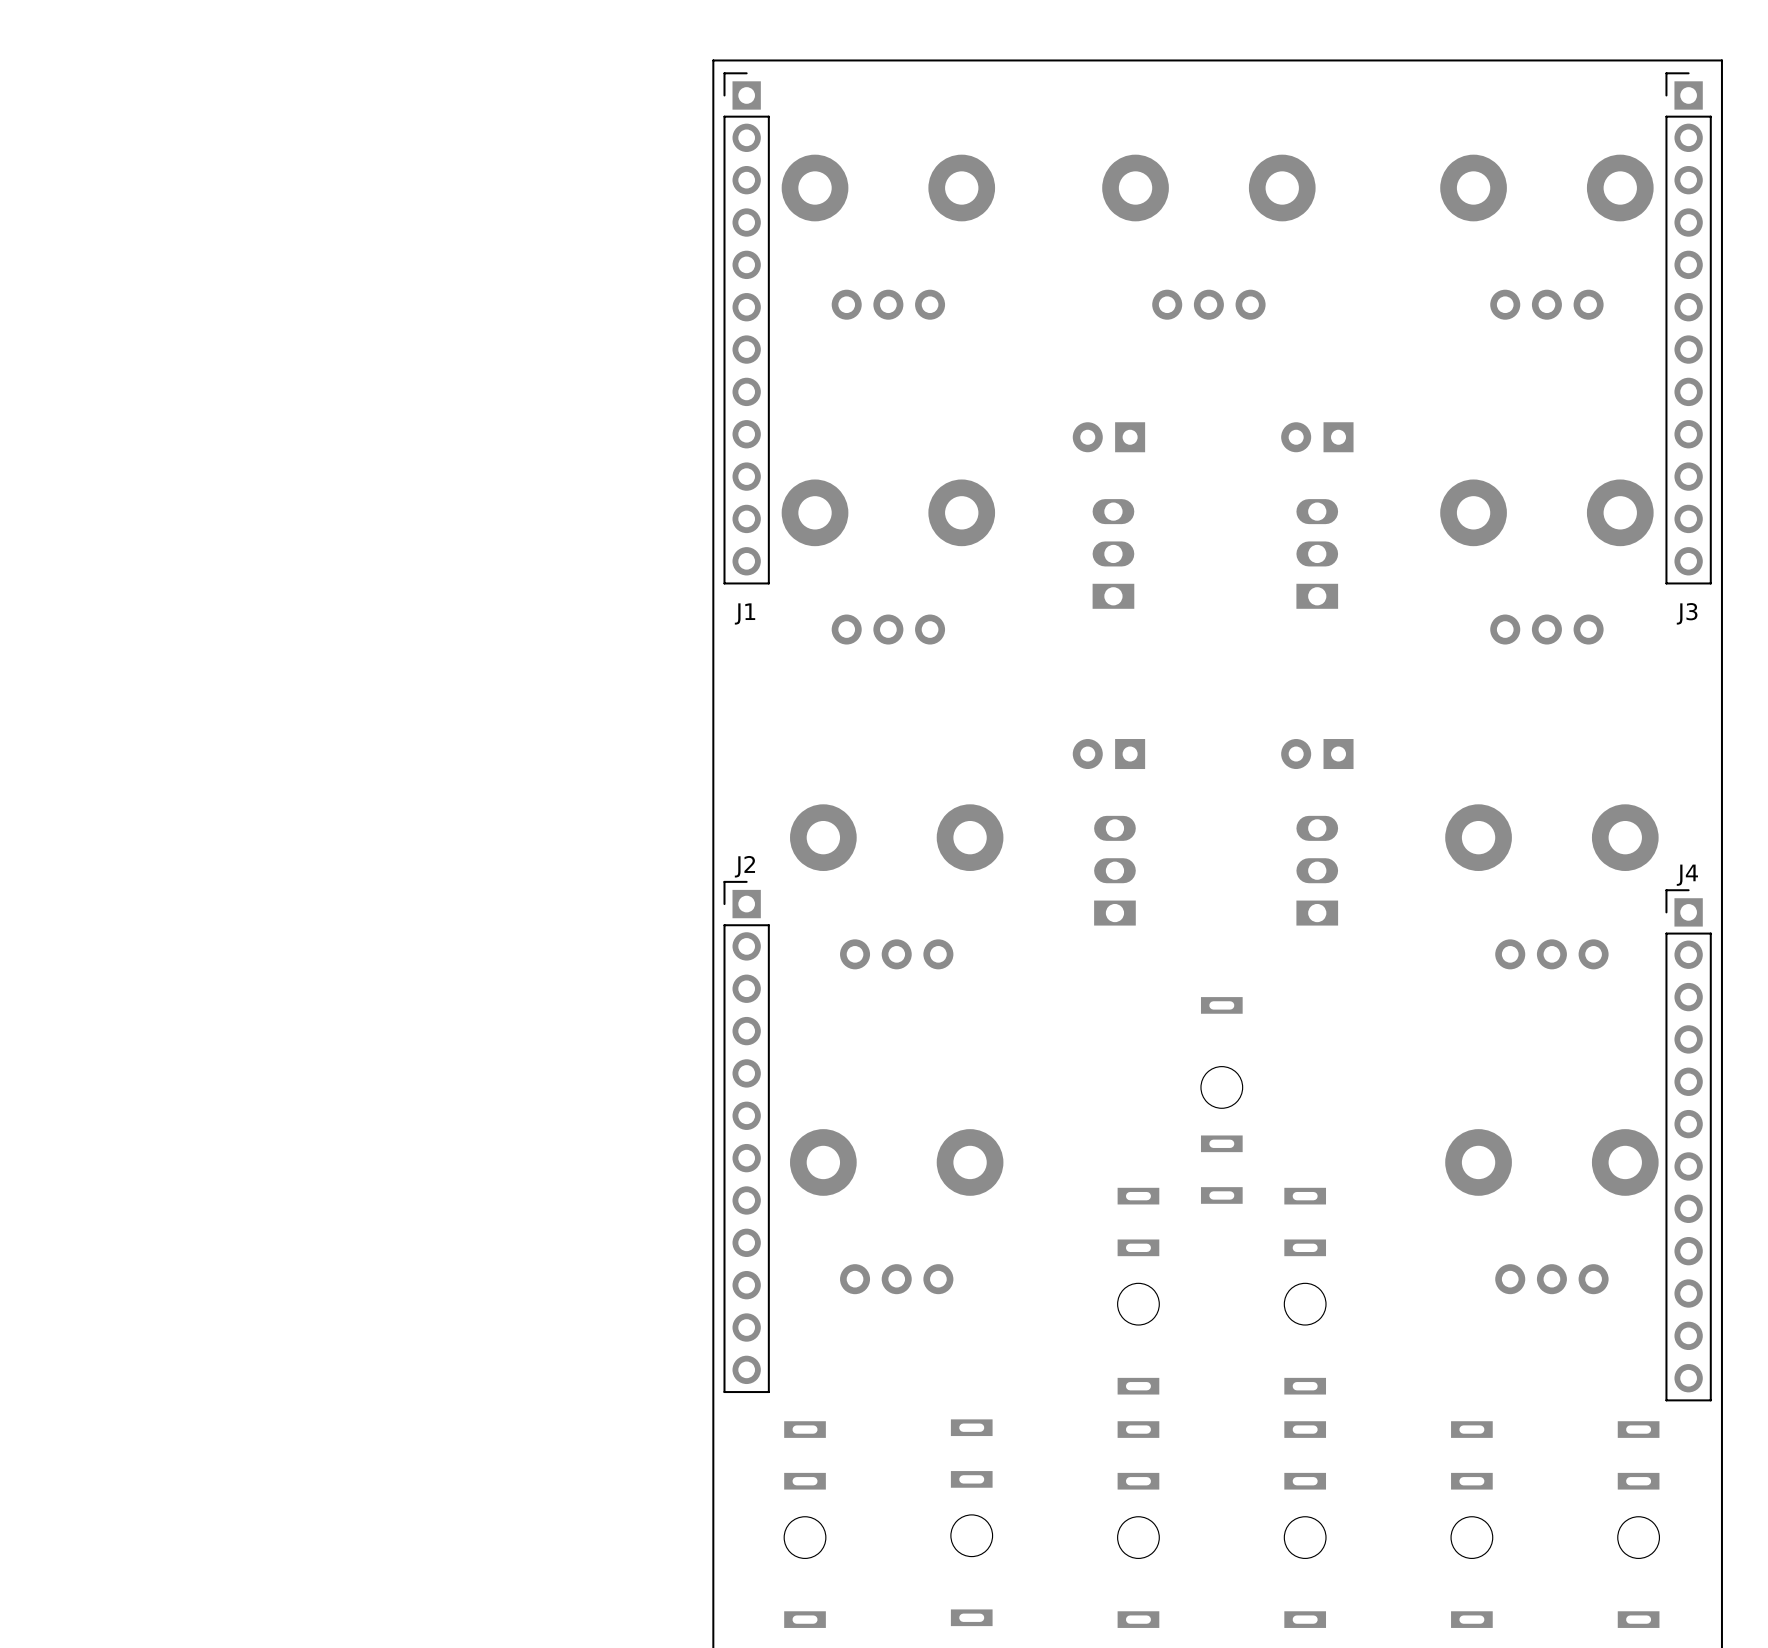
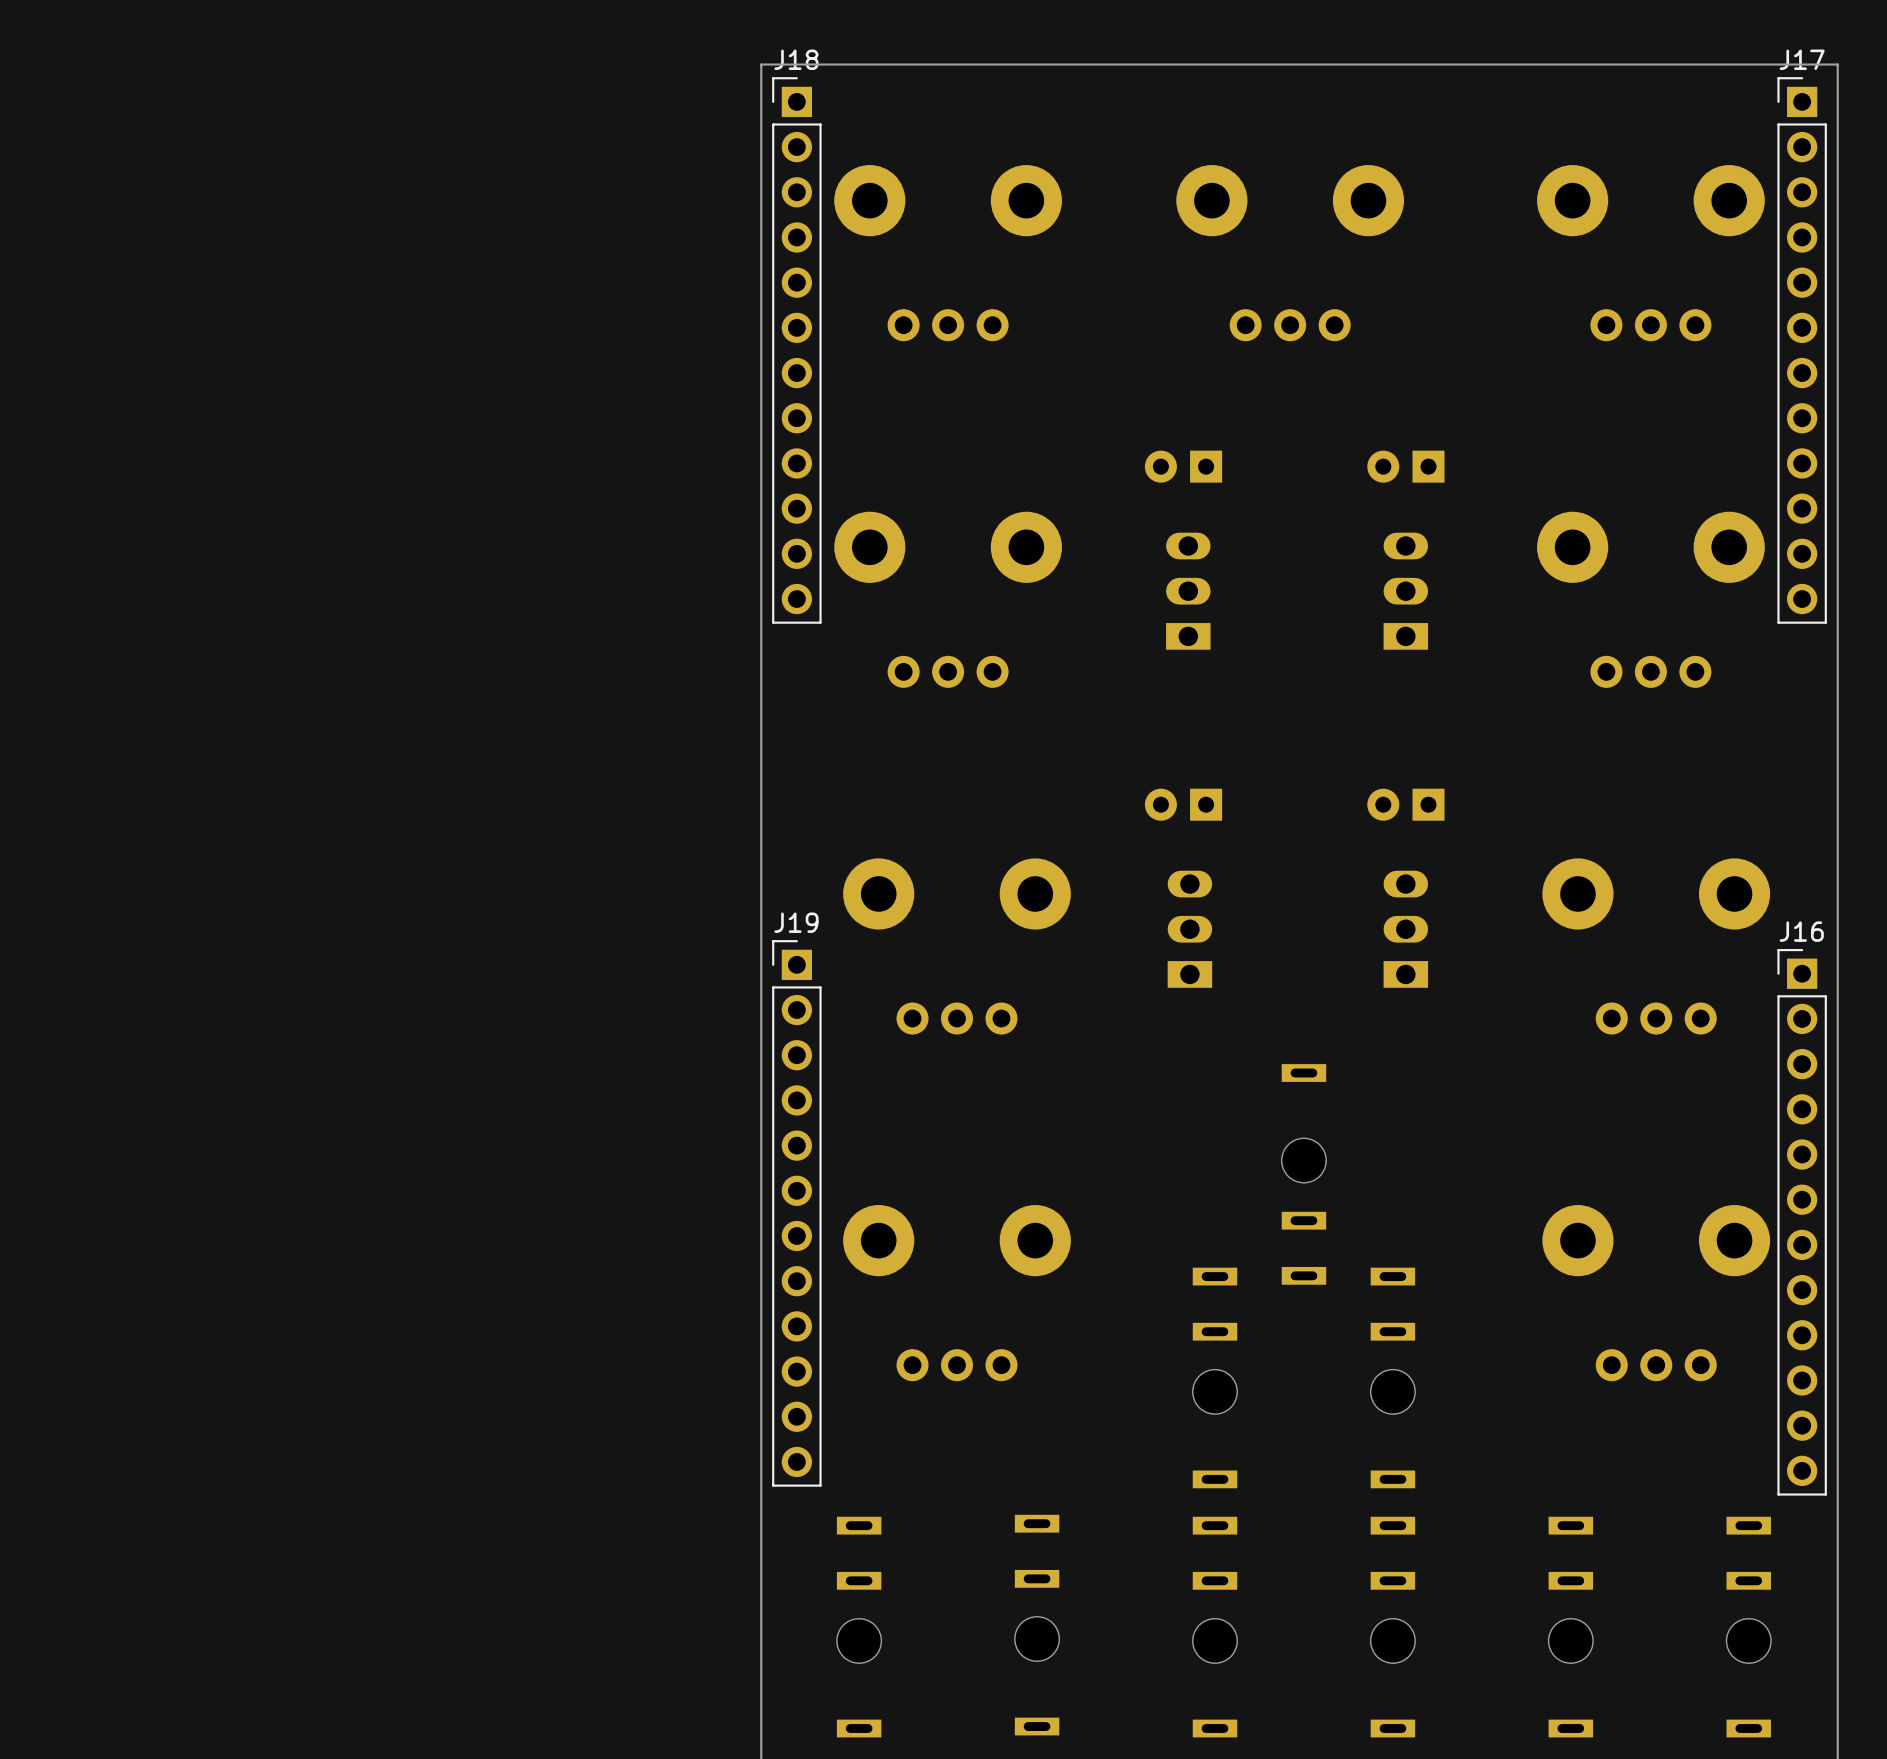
J1 name: J1 (745, 613) -> J18 (796, 59)
J3 name: J3 (1687, 613) -> J17 (1802, 59)
J2 name: J2 (744, 866) -> J19 (796, 922)
J4 name: J4 (1687, 875) -> J16 (1801, 931)

